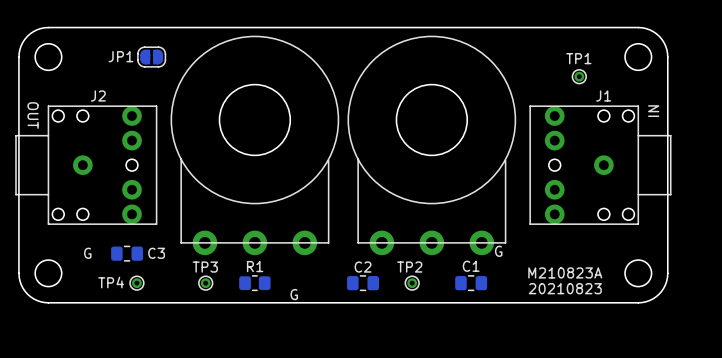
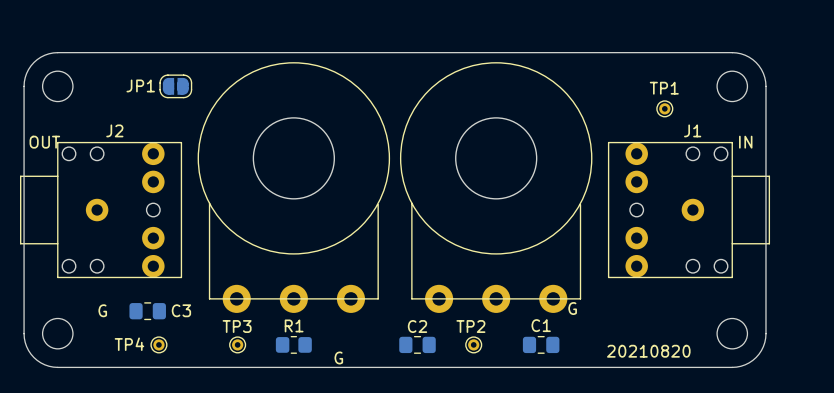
text rotation: 0° (653, 111) -> 90° clockwise (745, 142)
text rotation: 0° (33, 115) -> 90° counterclockwise (44, 142)
text: M210823A (565, 272) -> none
text: 20210823 (565, 288) -> 20210820 (648, 351)

